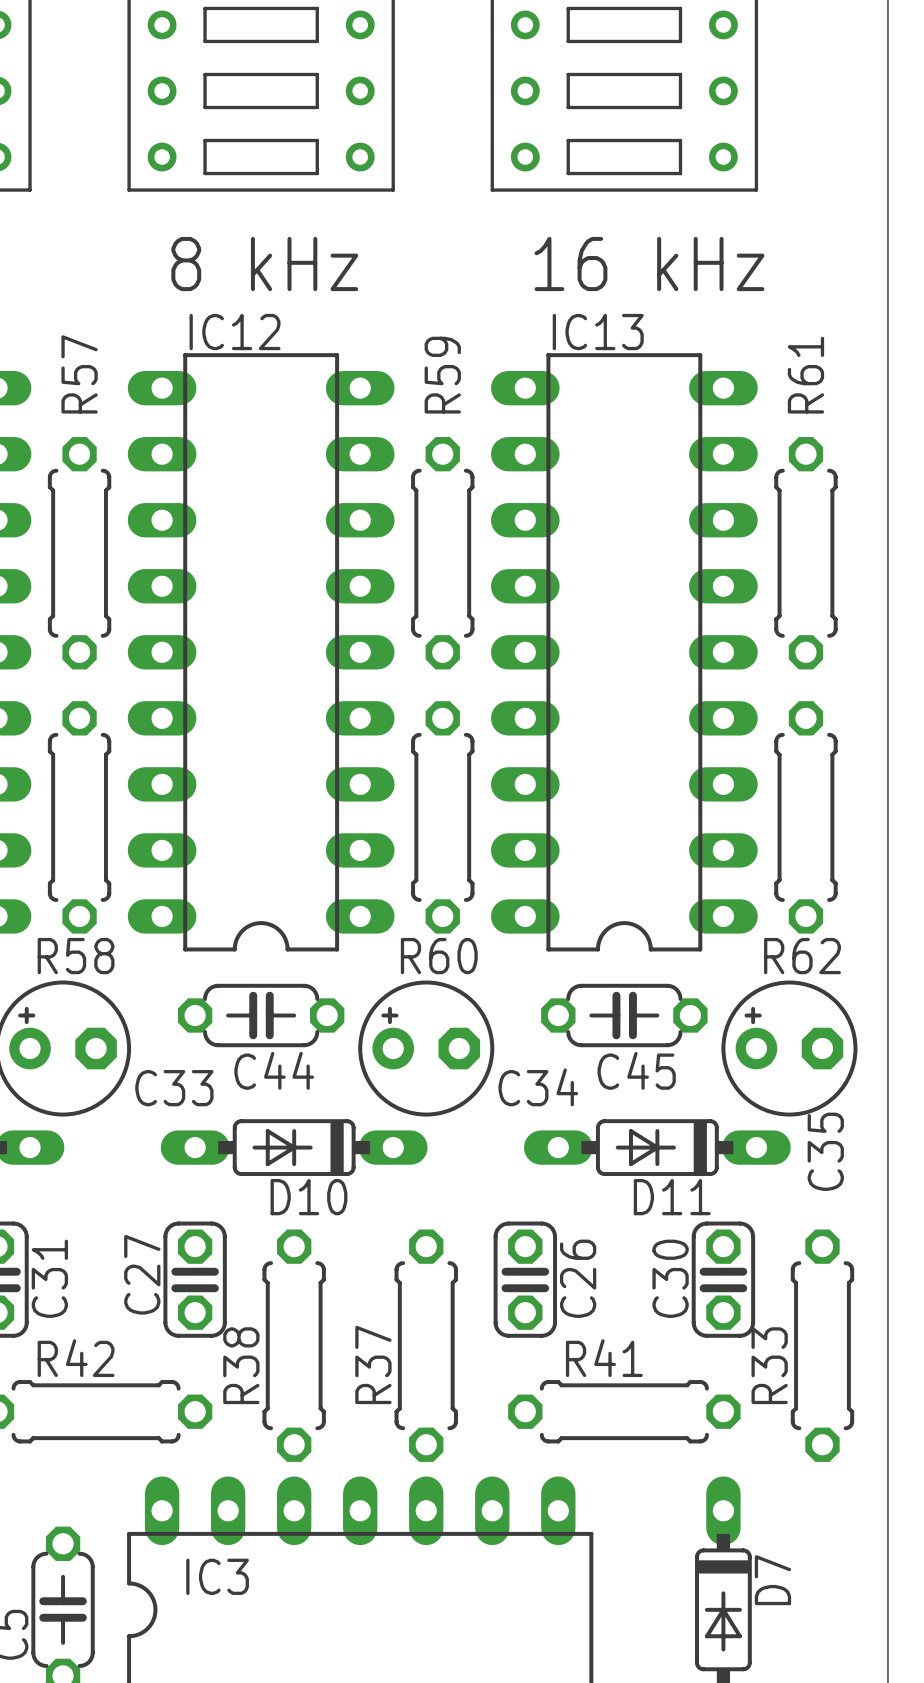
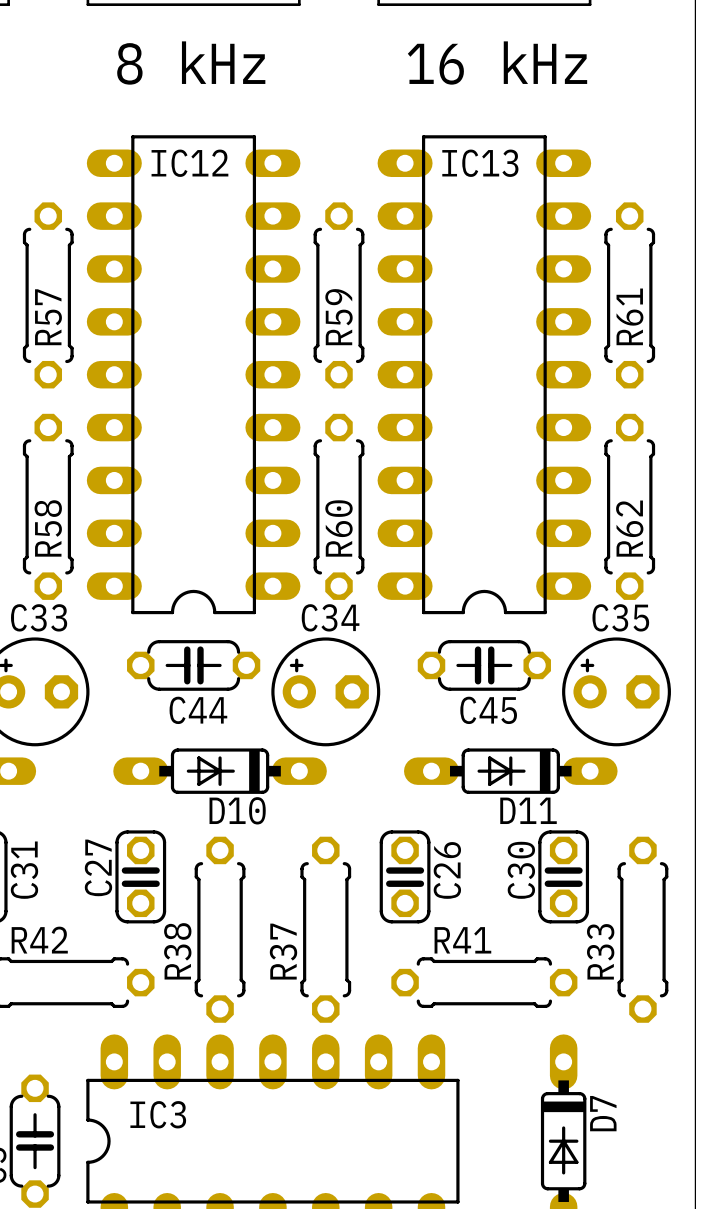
IC12 name position: IC12 (235, 332) -> IC12 (189, 163)
IC13 name position: IC13 (598, 332) -> IC13 (480, 163)
R57 name position: R57 (79, 374) -> R57 (48, 317)
R59 name position: R59 (442, 375) -> R59 (339, 317)
R61 name position: R61 (805, 375) -> R61 (629, 316)
R58 name rotation: 0° (76, 956) -> 90° counterclockwise (48, 528)
R58 name position: R58 (76, 956) -> R58 (48, 528)
R60 name rotation: 0° (439, 956) -> 90° counterclockwise (339, 528)
R60 name position: R60 (439, 956) -> R60 (339, 528)
R62 name rotation: 0° (802, 956) -> 90° counterclockwise (629, 528)
R62 name position: R62 (802, 956) -> R62 (629, 528)
C34 name position: C34 (538, 1087) -> C34 (330, 617)
C33 name position: C33 (174, 1088) -> C33 (39, 617)
C35 name rotation: 0° (825, 1151) -> 90° clockwise (620, 617)
C35 name position: C35 (825, 1151) -> C35 (620, 617)

